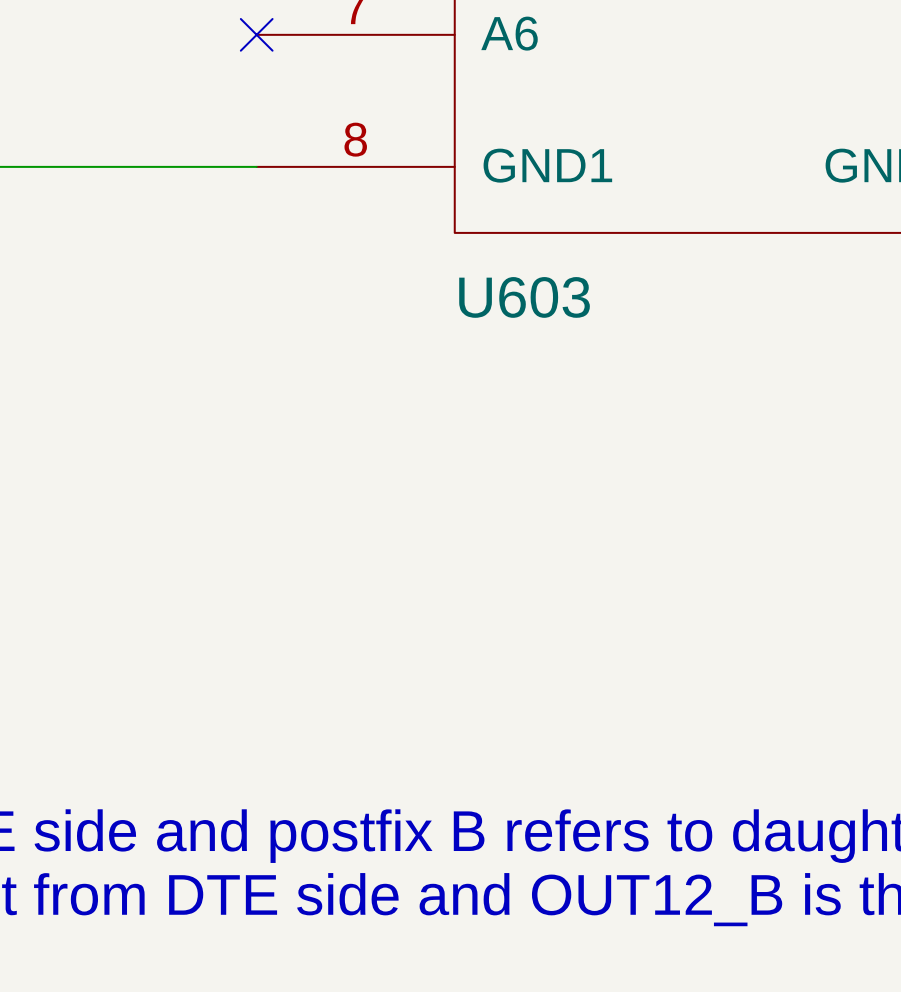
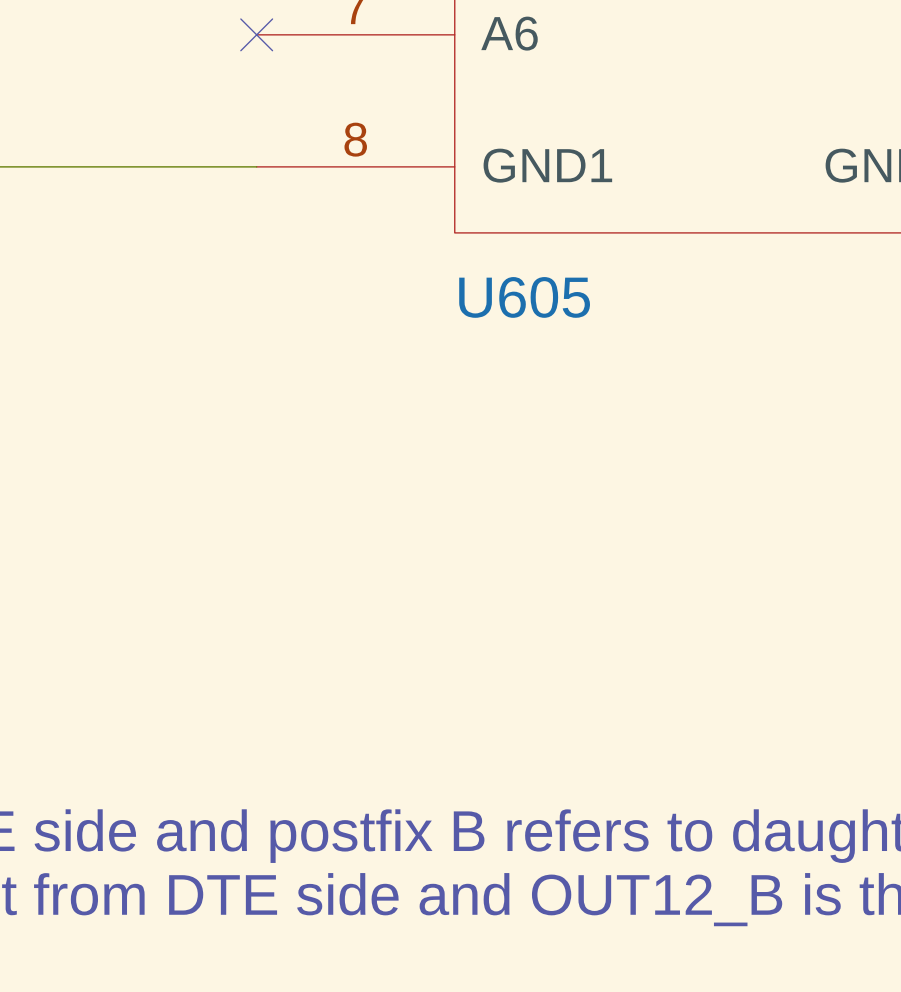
U603 name: U603 (524, 297) -> U605 (524, 297)

